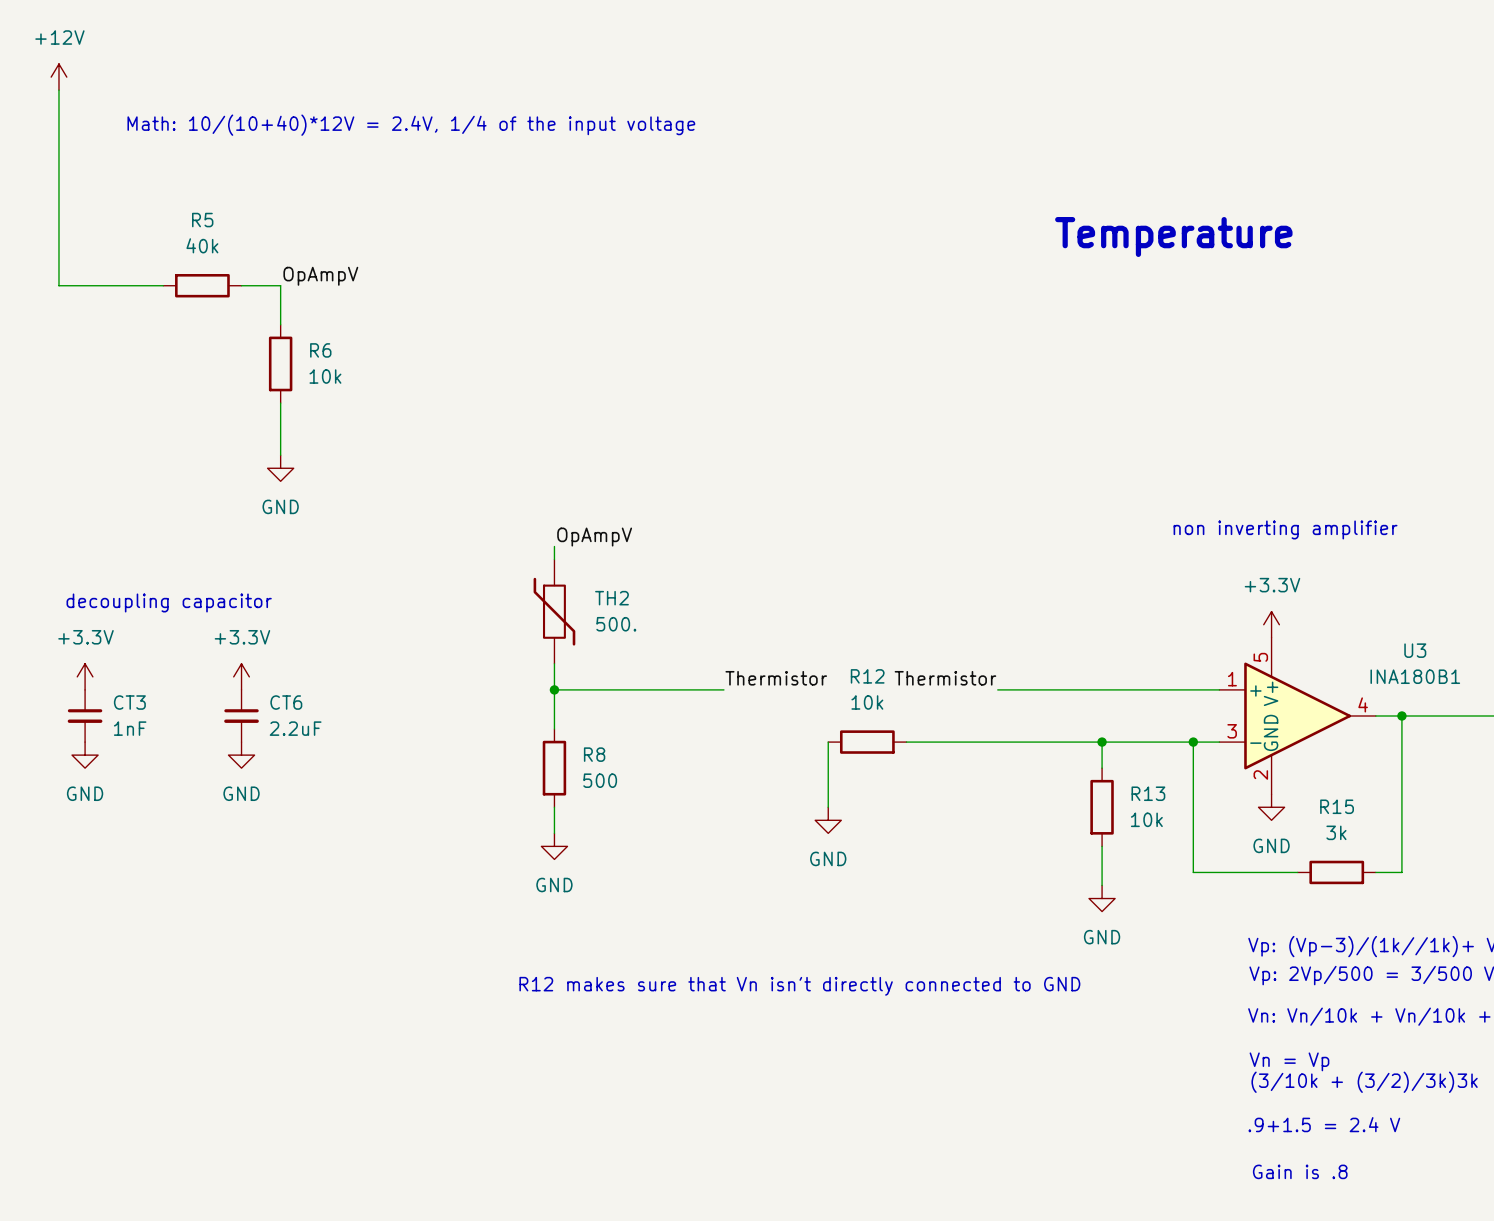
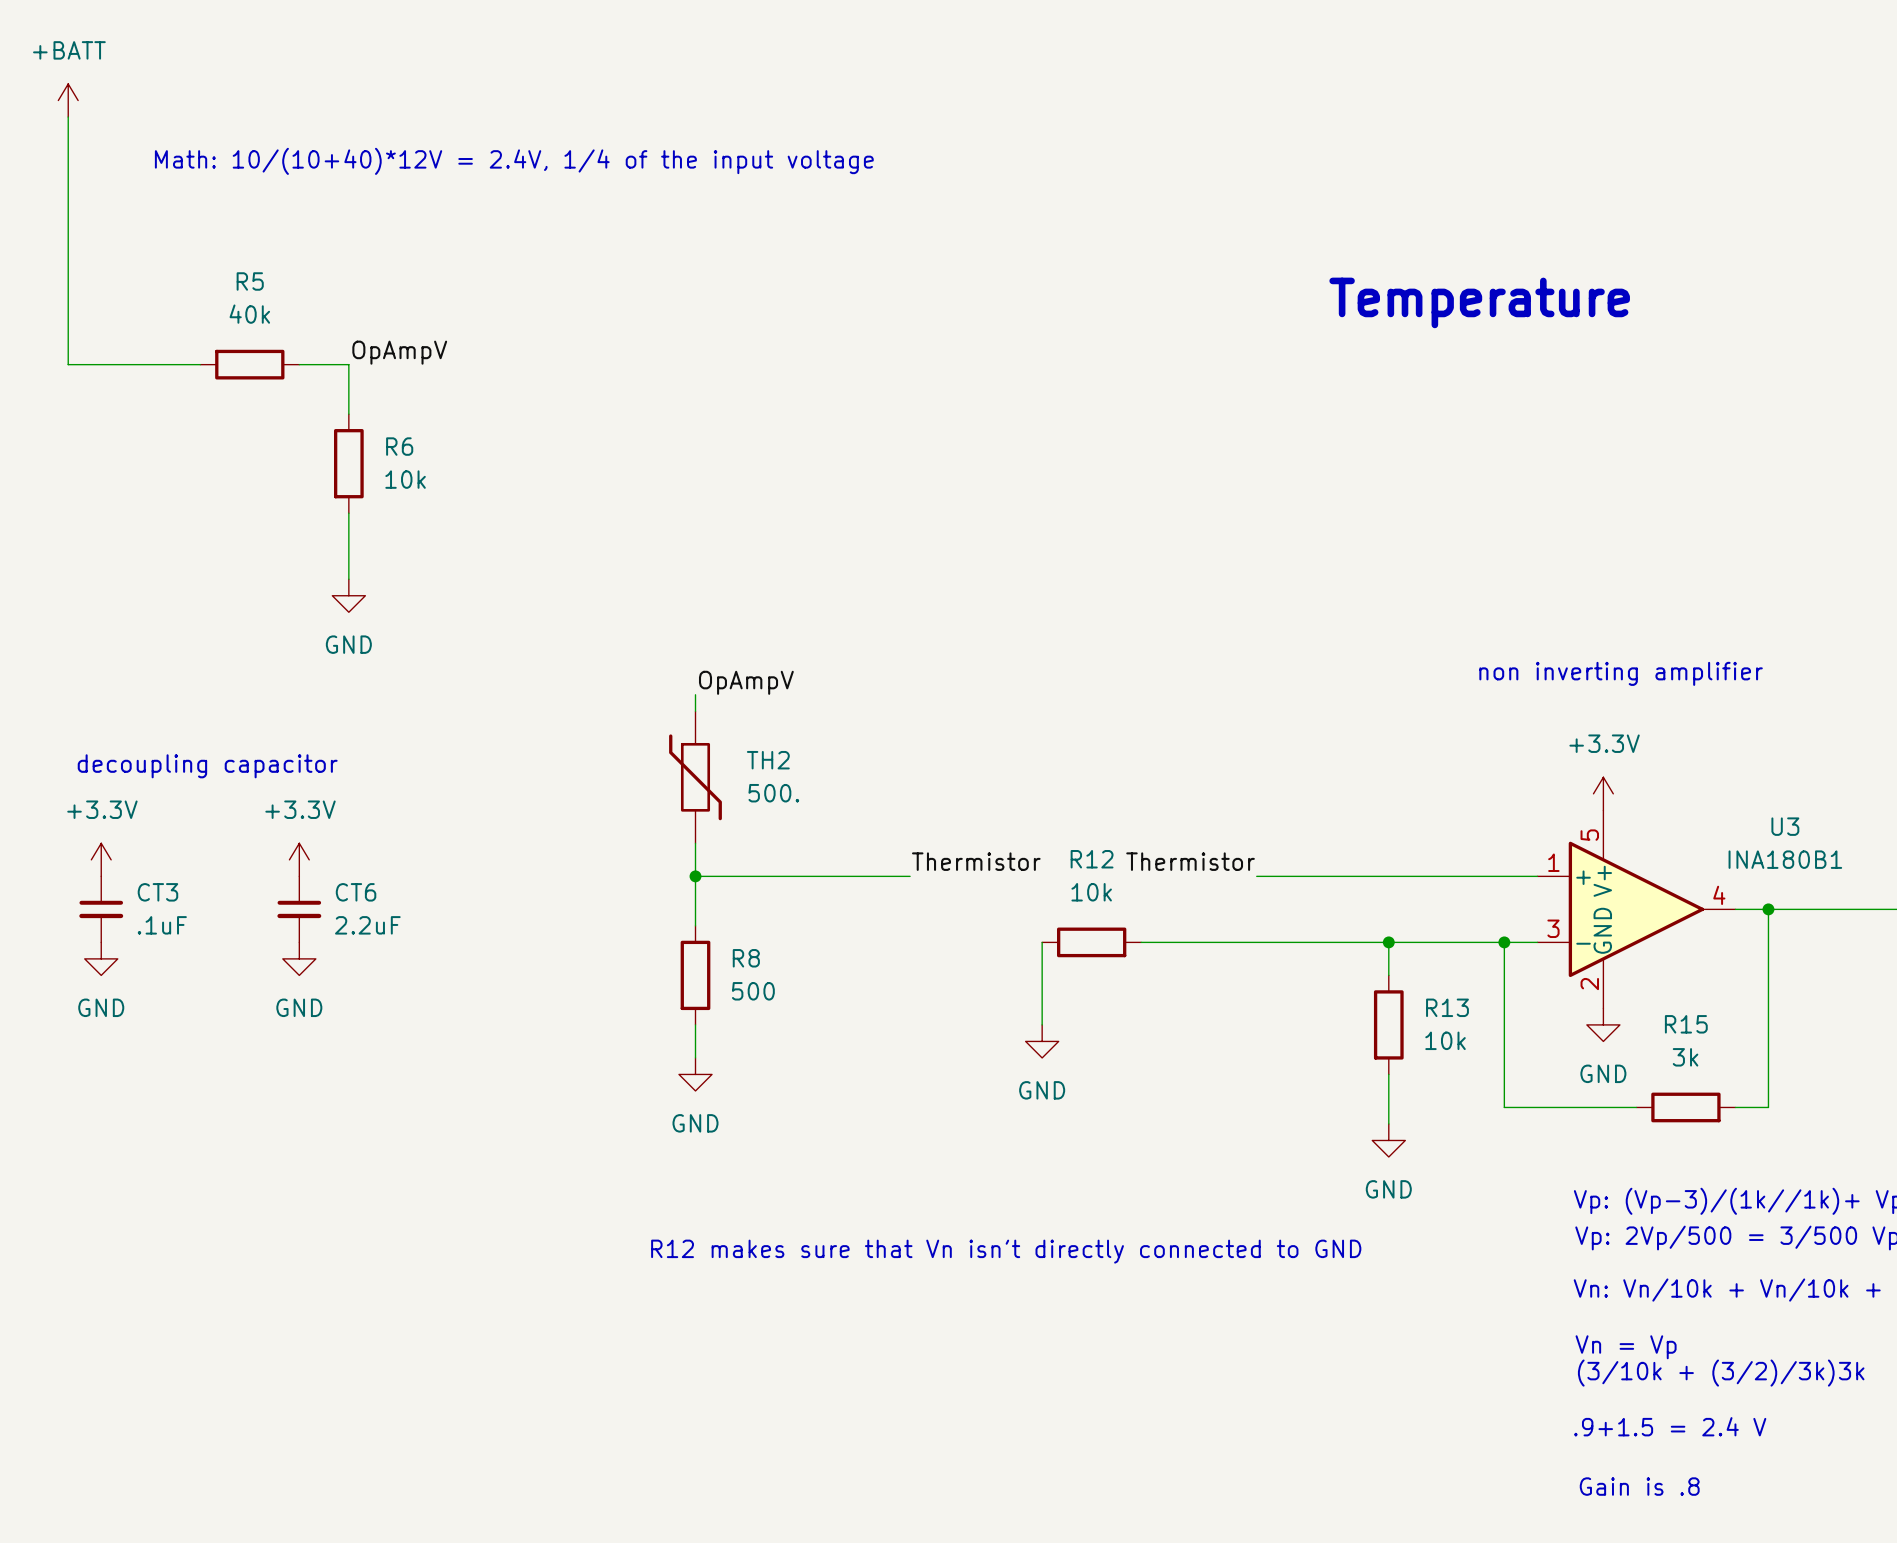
power symbol: +12V (58, 77) -> +BATT (68, 100)
CT3 value: 1nF (130, 728) -> .1uF (162, 925)

